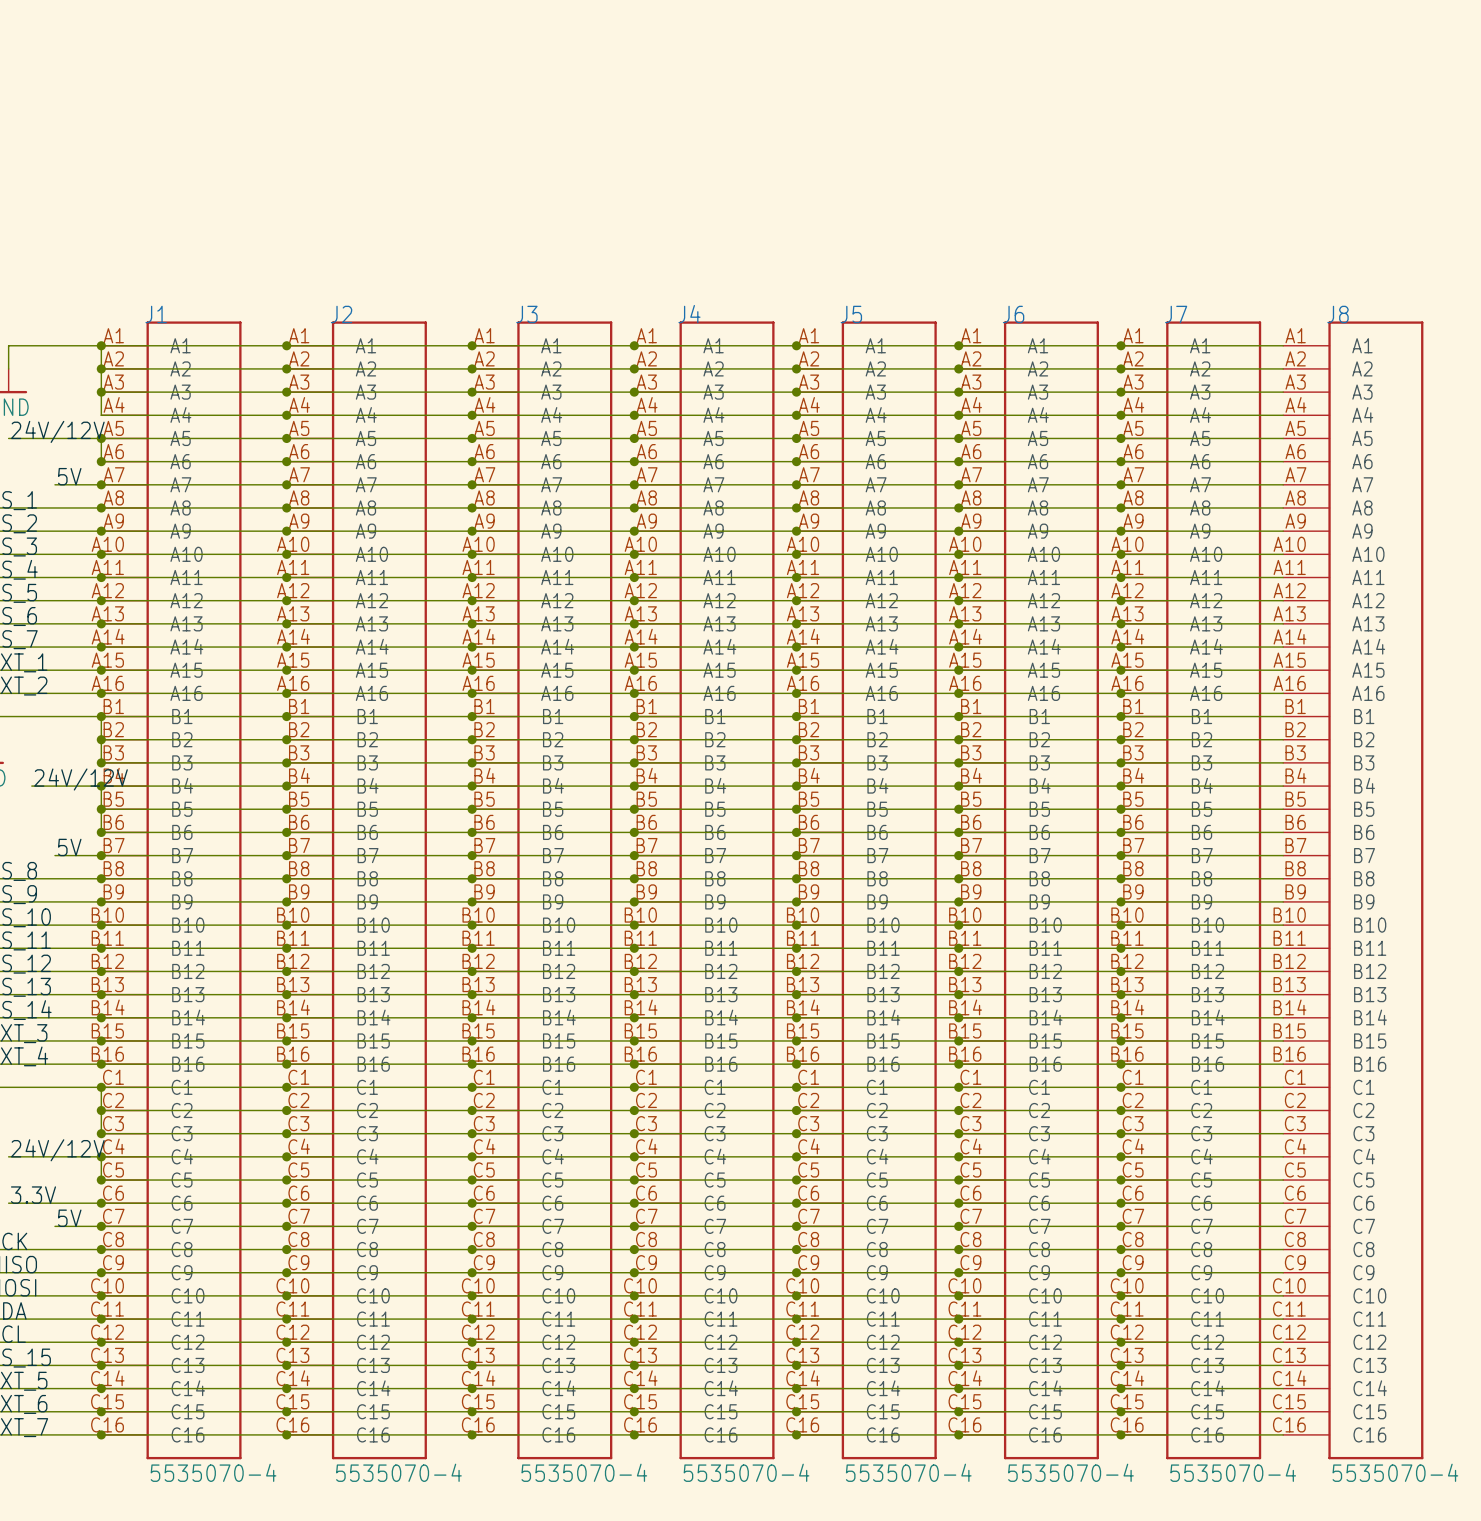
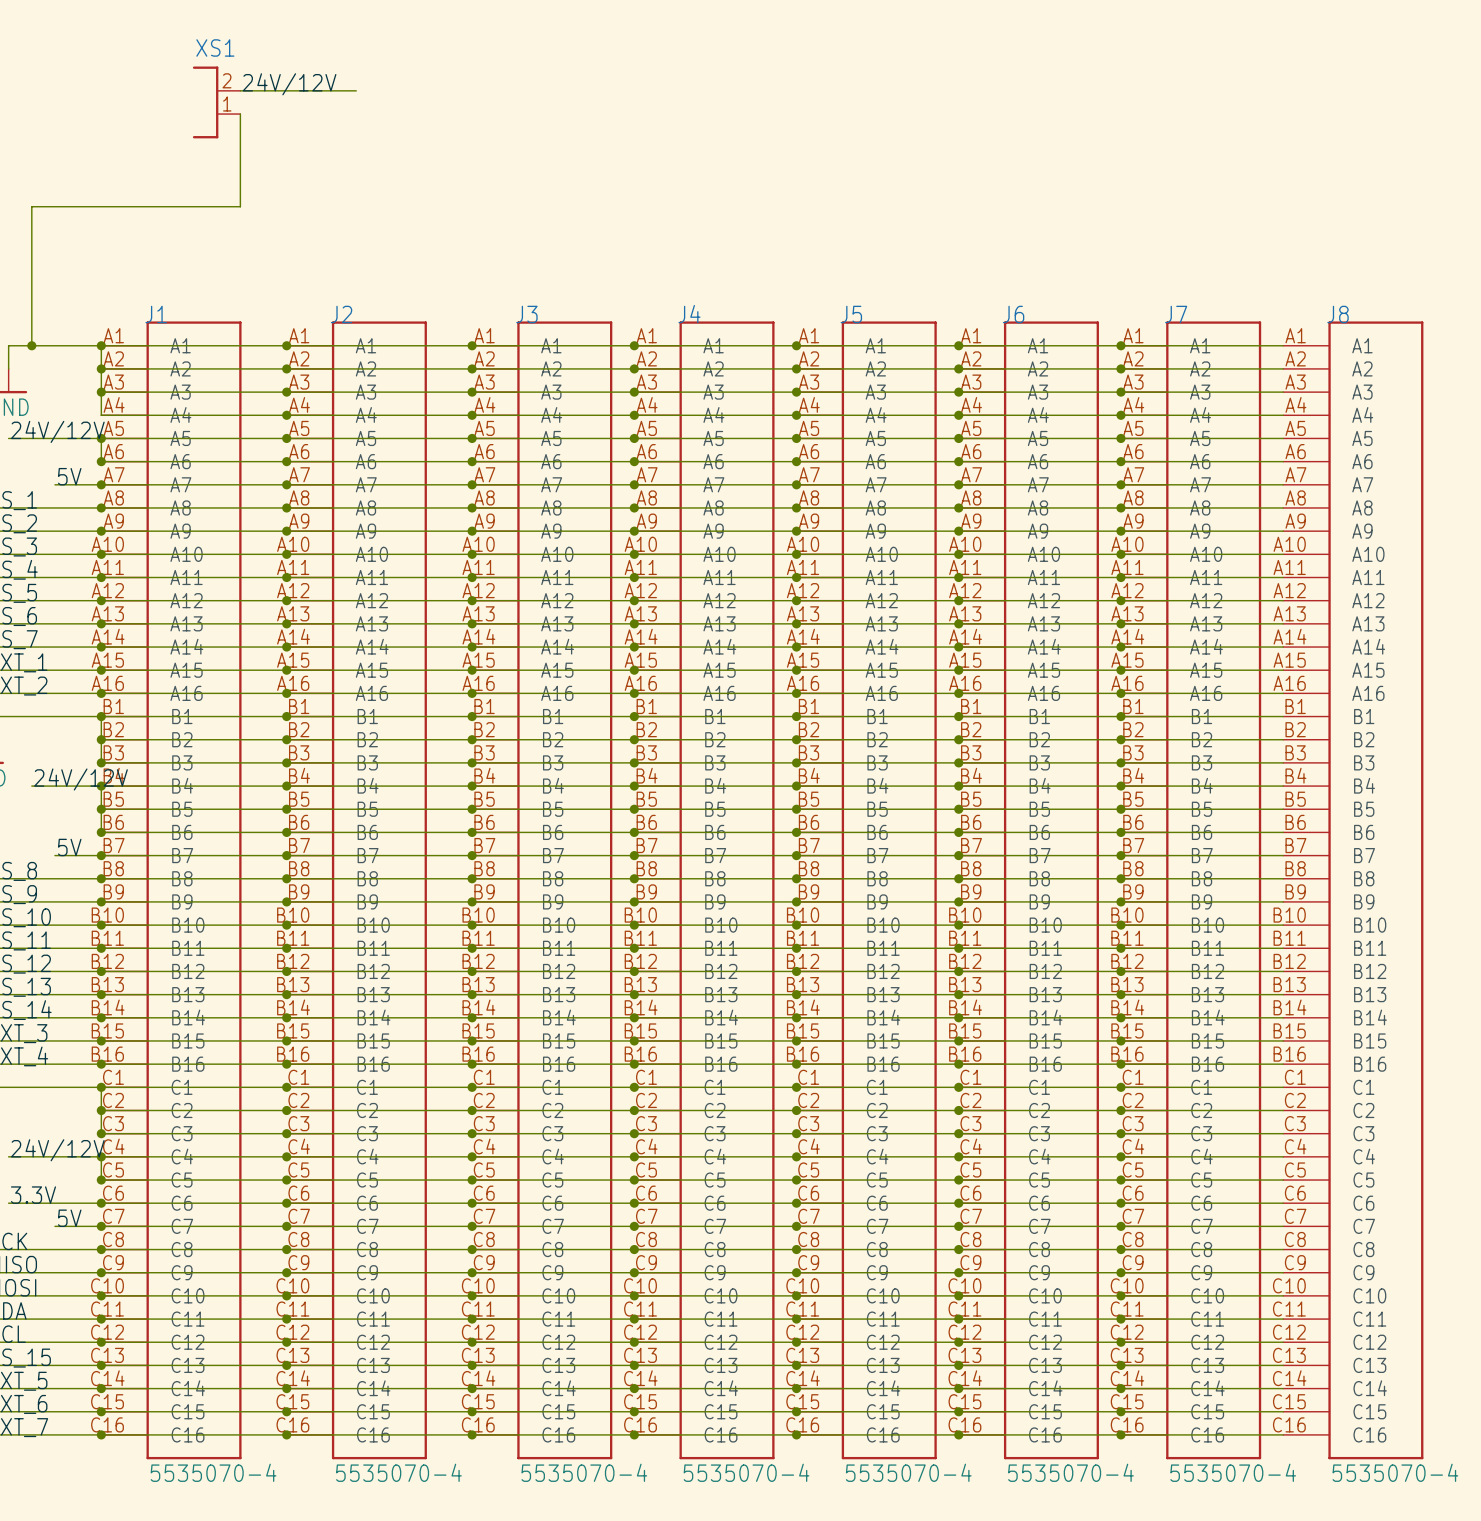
label: none -> 24V/12V (289, 84)
wire: none -> (240, 90) (356, 90)
XS1: none -> (216, 102)
wire: none -> (240, 114) (240, 206) (31, 206) (31, 345)
junction: none -> (31, 345)

